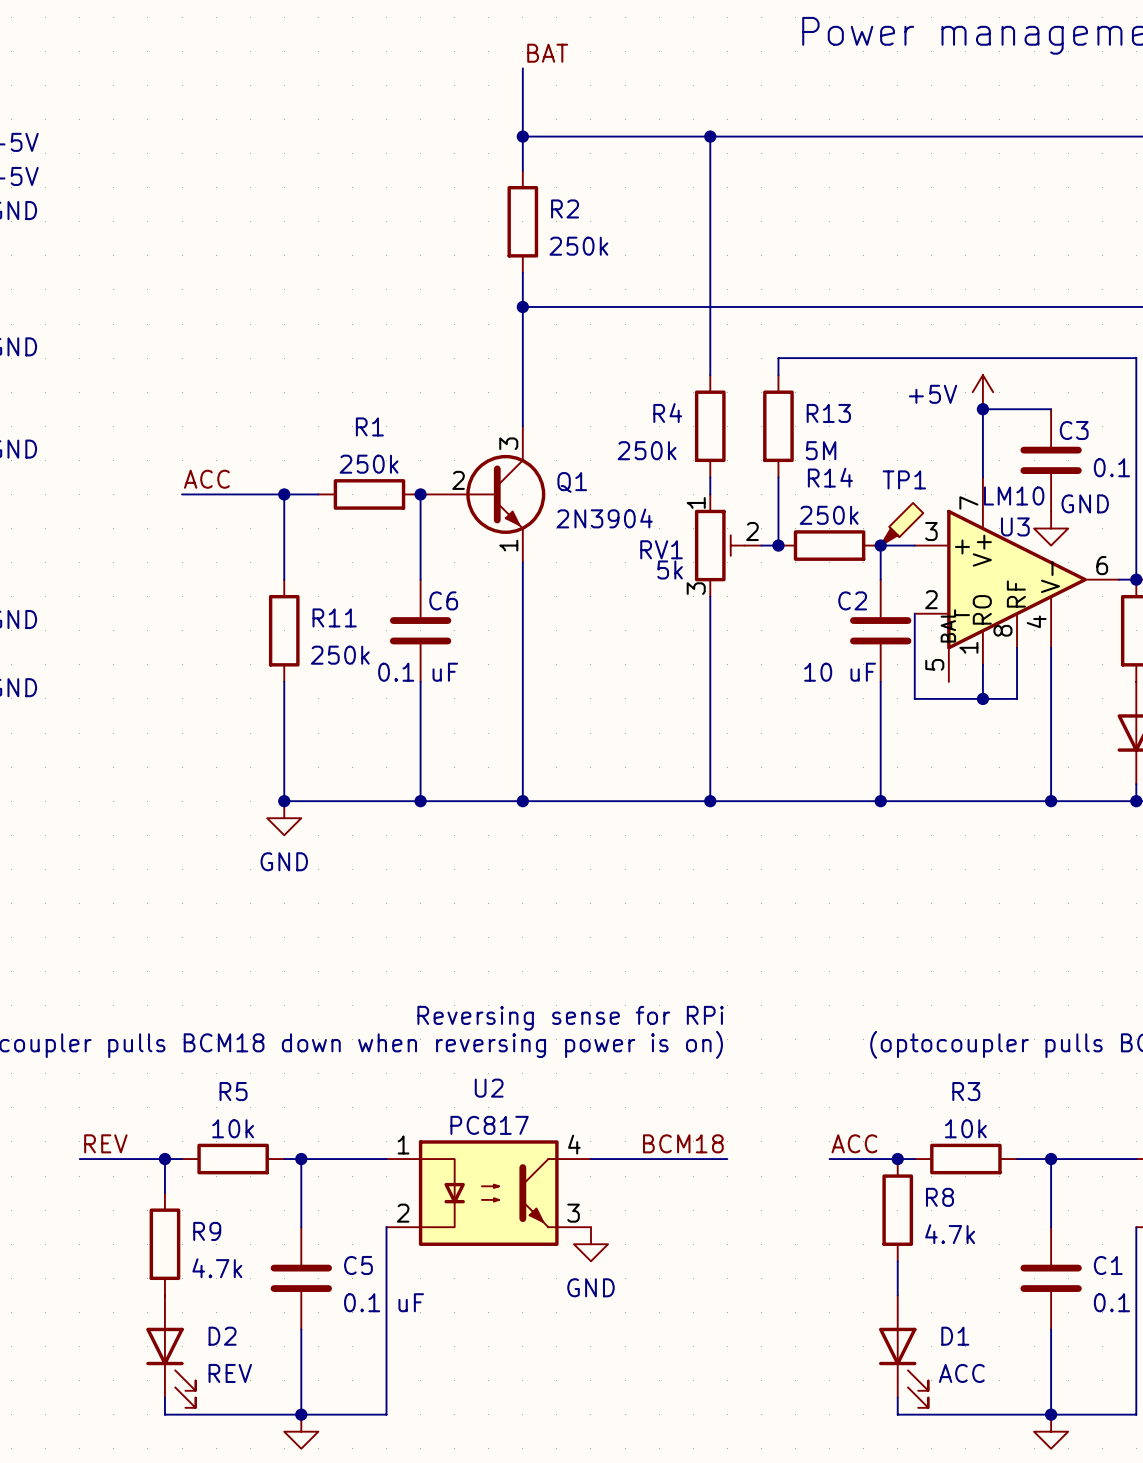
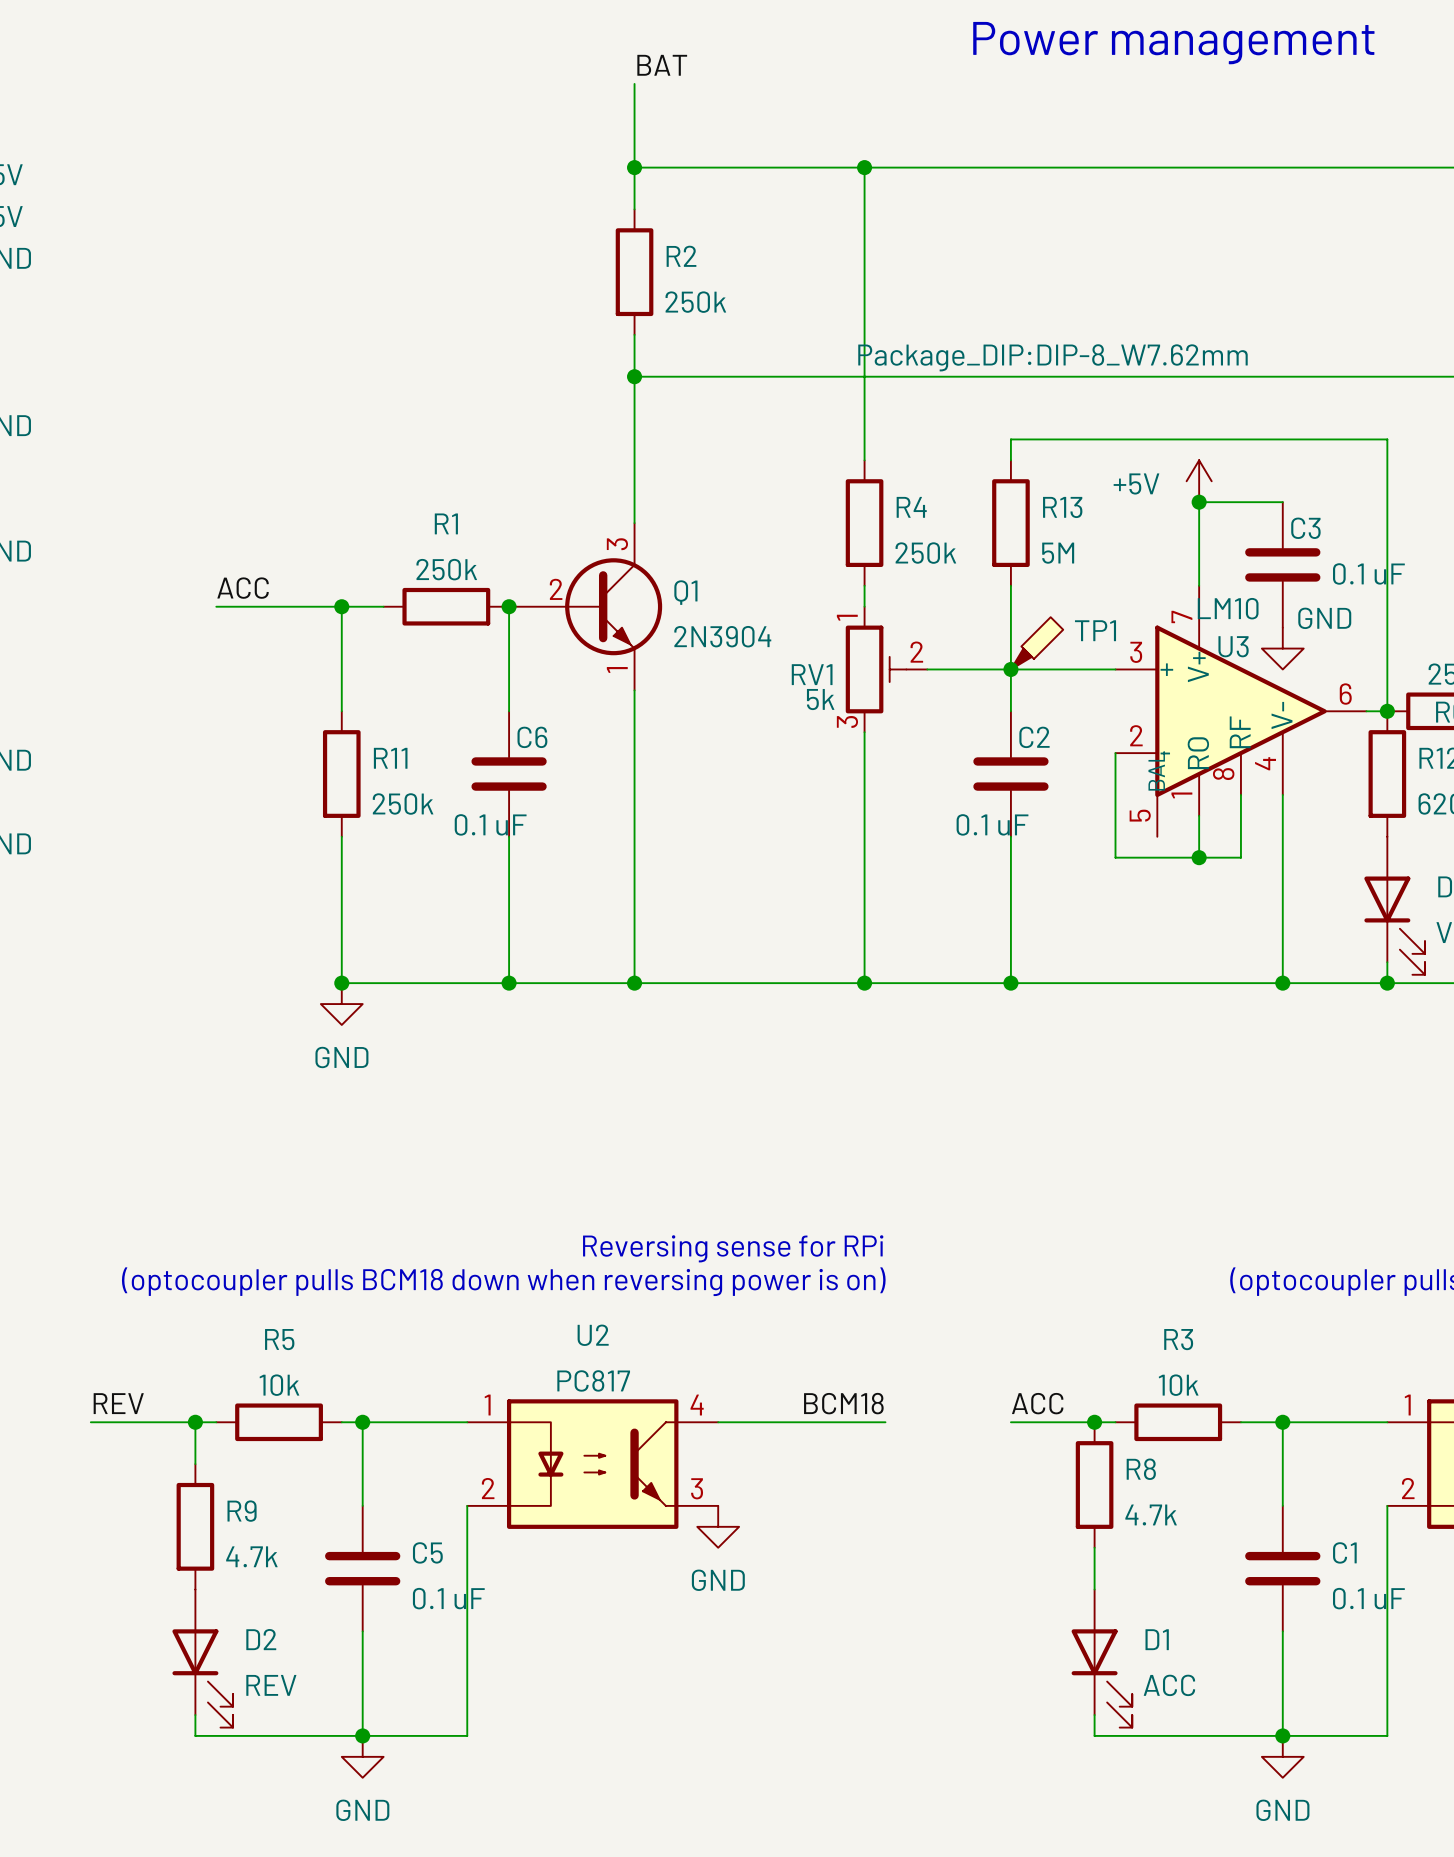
U3 text: none -> Package_DIP:DIP-8_W7.62mm (1052, 357)
wire: (829, 358) (778, 358) (778, 375) -> (1010, 439) (1010, 460)
R4 name position: R4 (667, 413) -> R4 (911, 507)
R13 position: (778, 426) -> (1010, 523)
R4 value position: 250k (647, 450) -> 250k (925, 553)
wire: (778, 477) (778, 545) -> none
wire: none -> (1010, 585) (1010, 711)
TP1 name position: TP1 (904, 479) -> TP1 (1095, 630)
TP1 position: (901, 524) -> (1037, 643)
junction: (778, 545) -> none
junction: none -> (1010, 669)
R14: 250k (829, 545) -> none
wire: (880, 545) (880, 579) -> (1073, 669) (948, 669)
junction: (880, 545) -> none
C2 position: (880, 630) -> (1010, 774)
C2 value: 10 uF (840, 672) -> 0.1 uF (992, 824)
wire: (880, 681) (880, 801) -> (1010, 836) (1010, 983)
junction position: (880, 801) -> (1010, 983)

